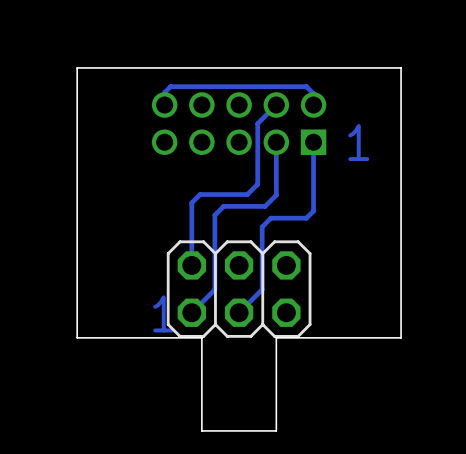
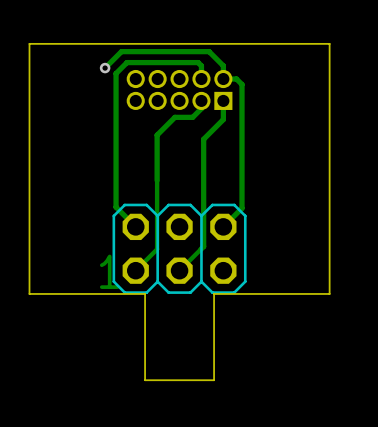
part footprint: [151, 92, 327, 155] -> [126, 69, 233, 110]
track: none -> (105, 68) (121, 51) (209, 51) (223, 65) (223, 79) (236, 79) (242, 84) (242, 208) (223, 226)
via: none -> (105, 68)
track: (276, 104) (257, 123) (257, 184) (247, 194) (200, 194) (191, 202) (191, 265) -> (201, 79) (201, 65) (198, 62) (126, 62) (116, 73) (116, 207) (135, 226)
track: (313, 104) (313, 93) (306, 86) (170, 86) (164, 92) (164, 104) -> none
track: (276, 142) (276, 195) (265, 206) (223, 206) (214, 215) -> (201, 100) (201, 108) (192, 117) (174, 117) (157, 135) (157, 180)
track: (313, 142) (313, 211) (306, 218) (271, 218) (262, 227) (262, 289) -> (223, 100) (223, 119) (203, 139) (203, 246) (200, 249)
text: 1 (358, 142) -> none

